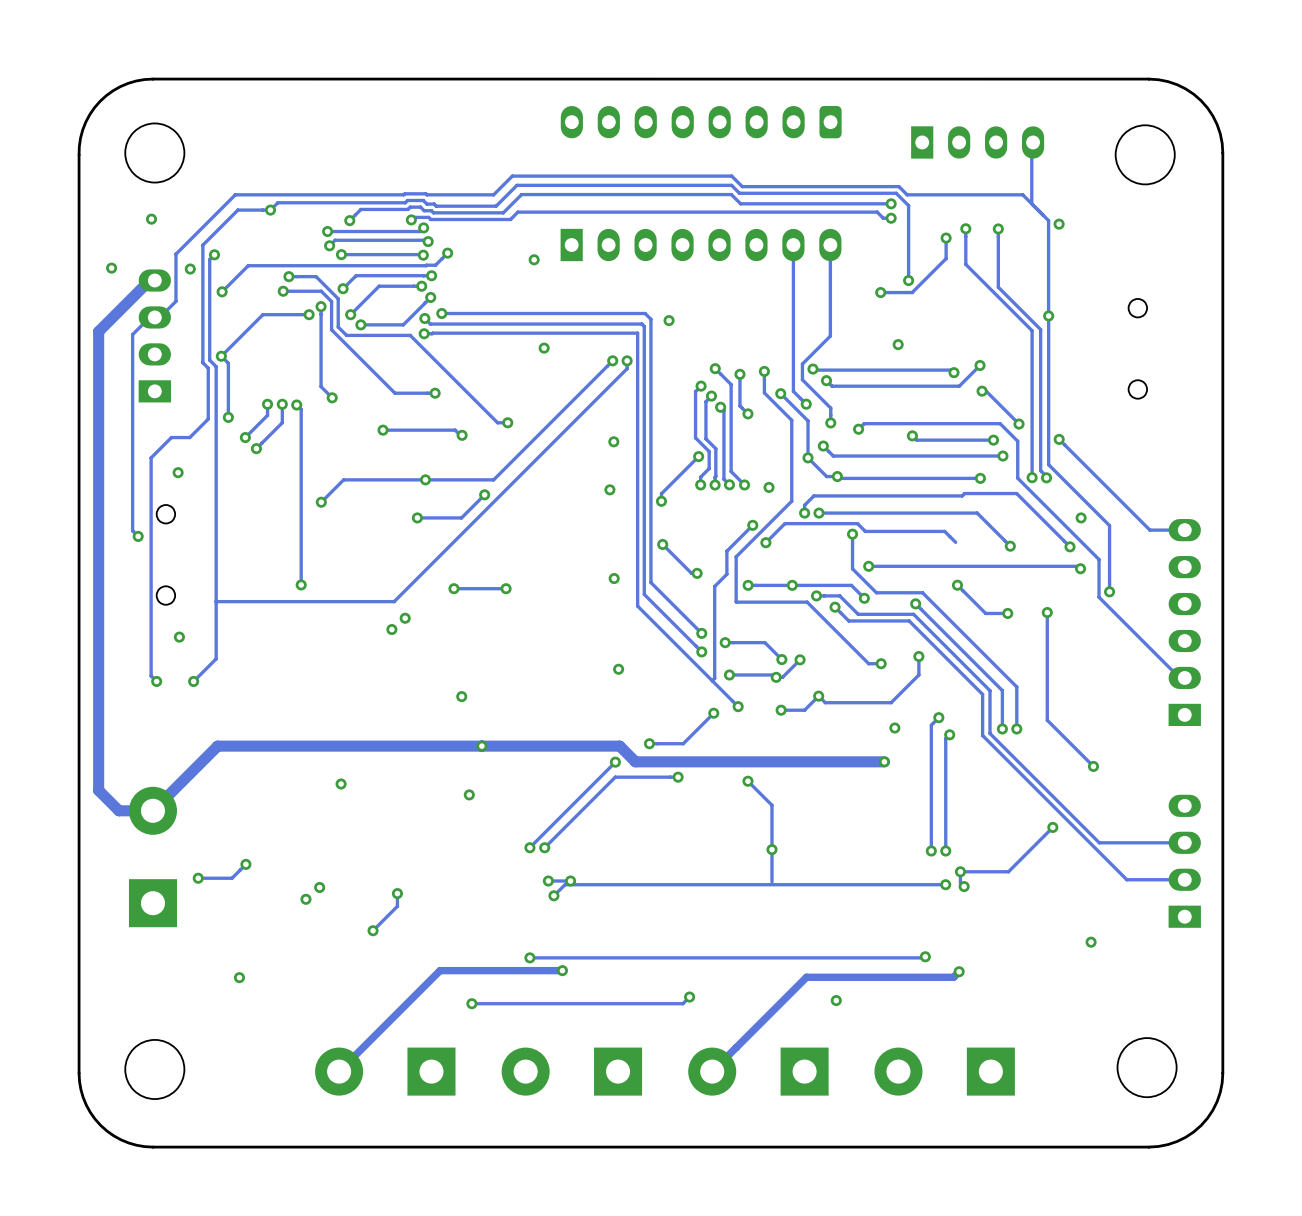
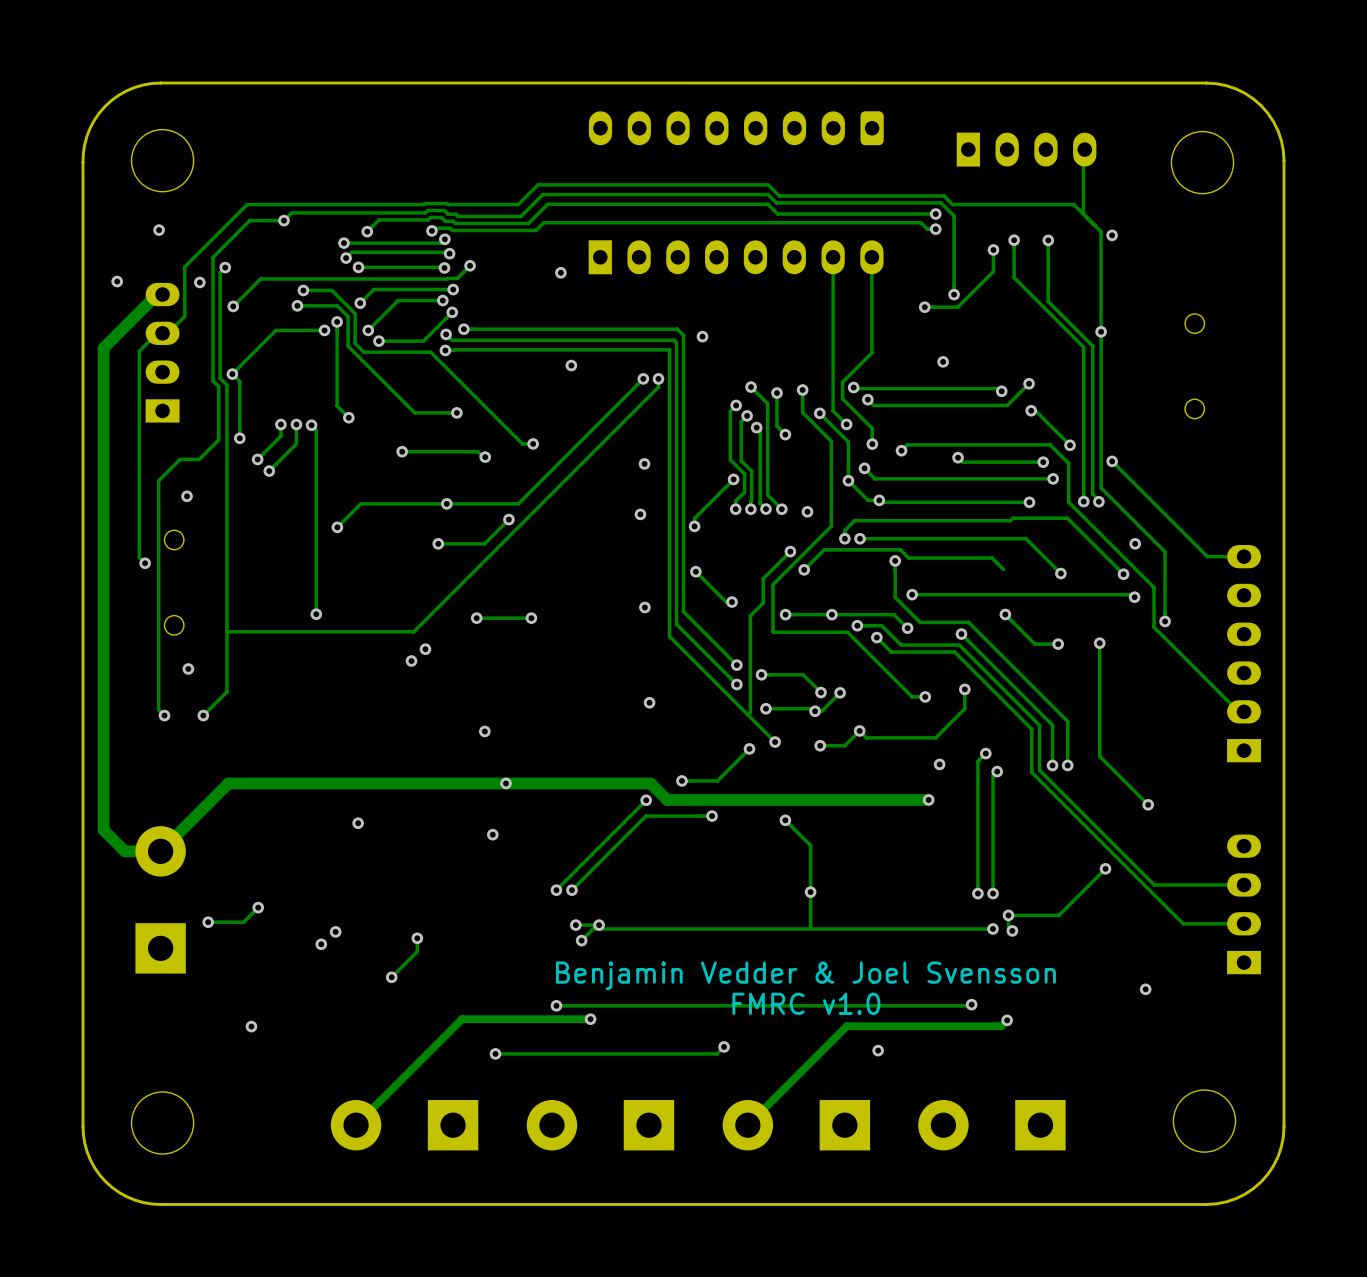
text: none -> Benjamin Vedder & Joel Svensson (805, 975)
text: none -> FMRC v1.0 (806, 1003)

